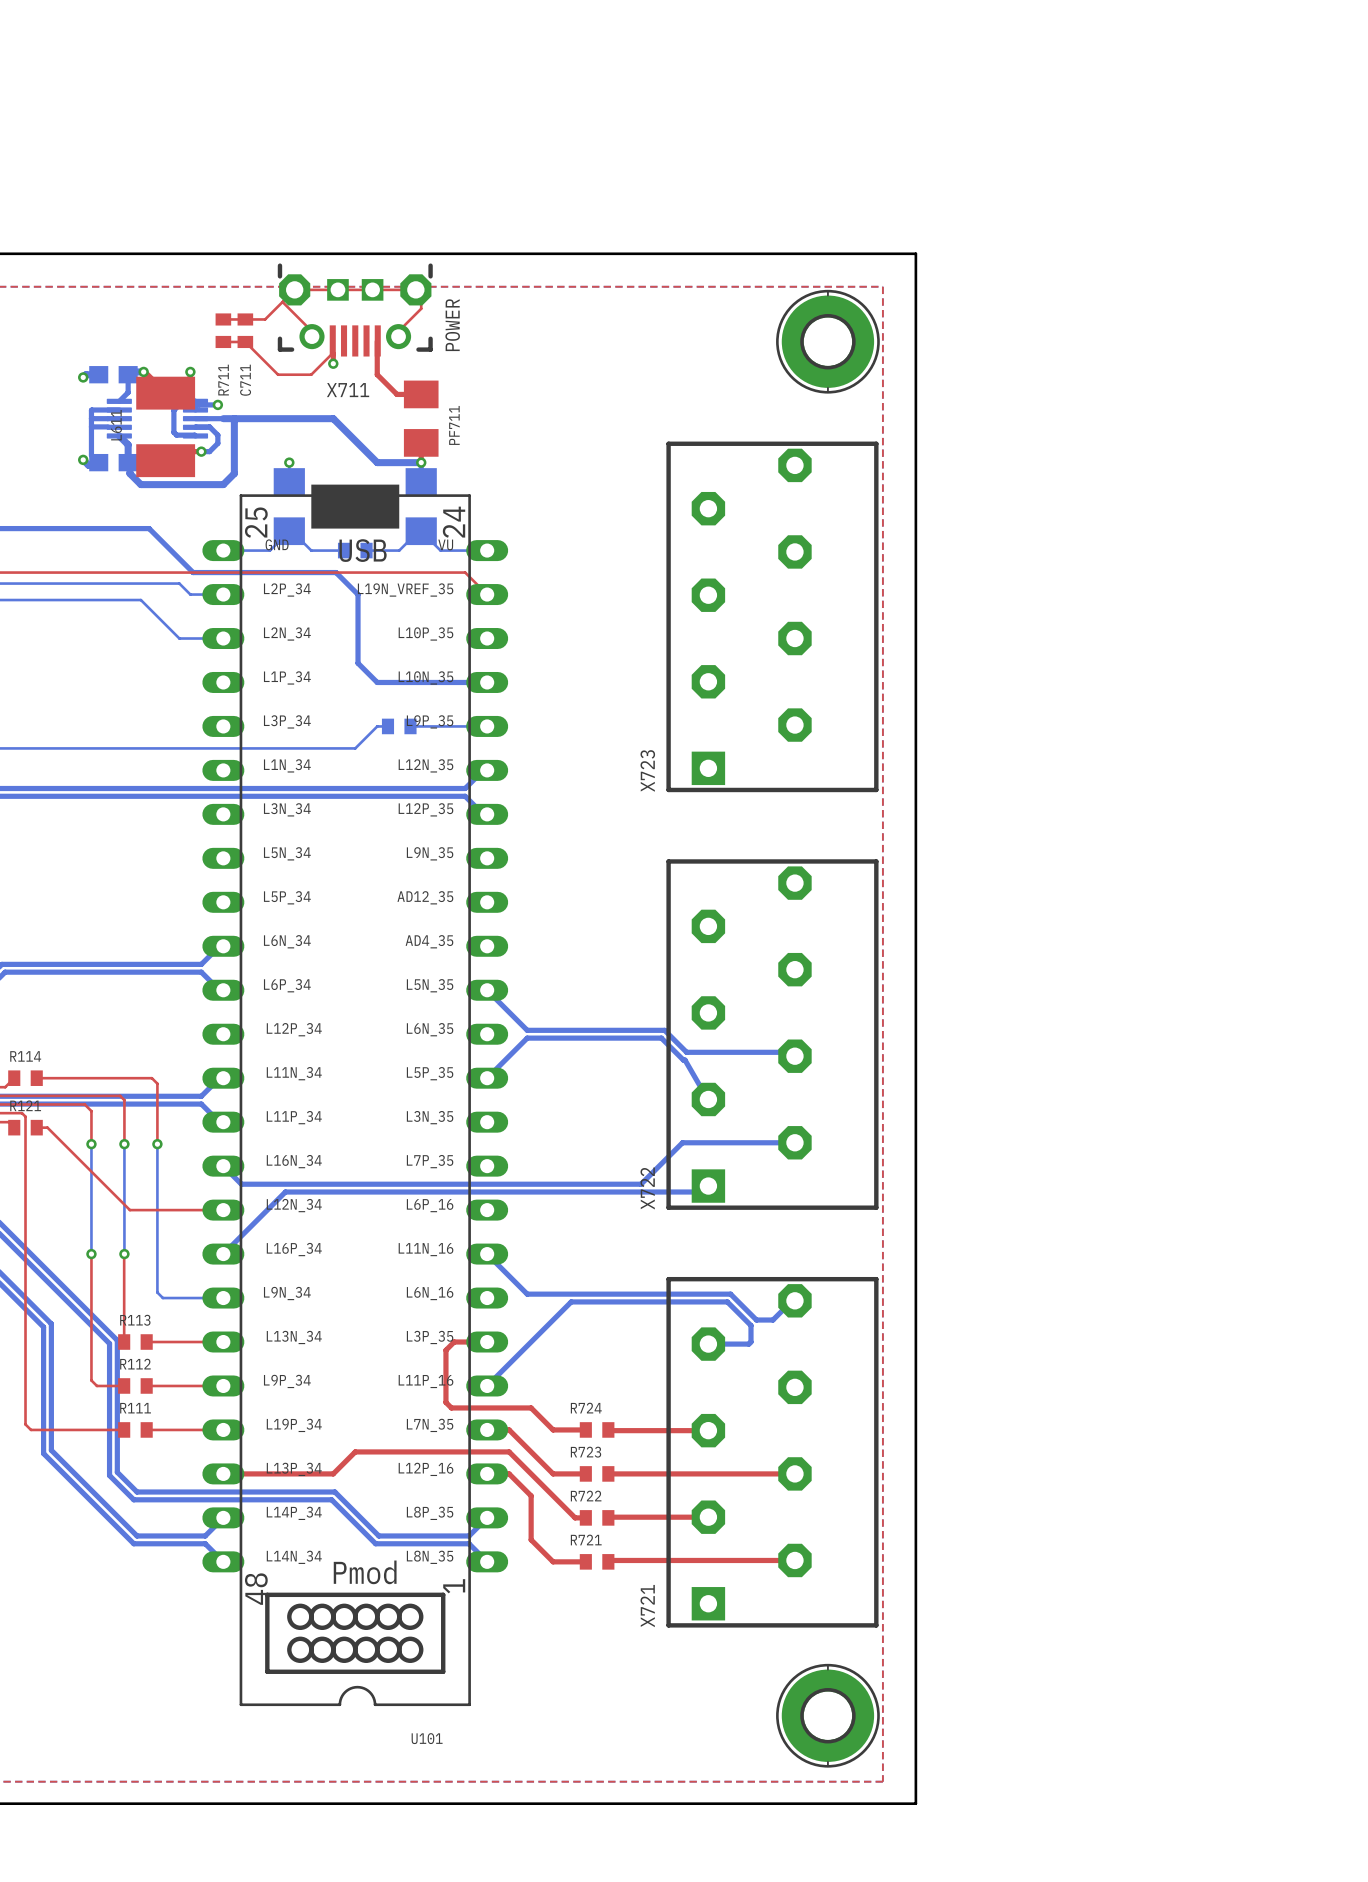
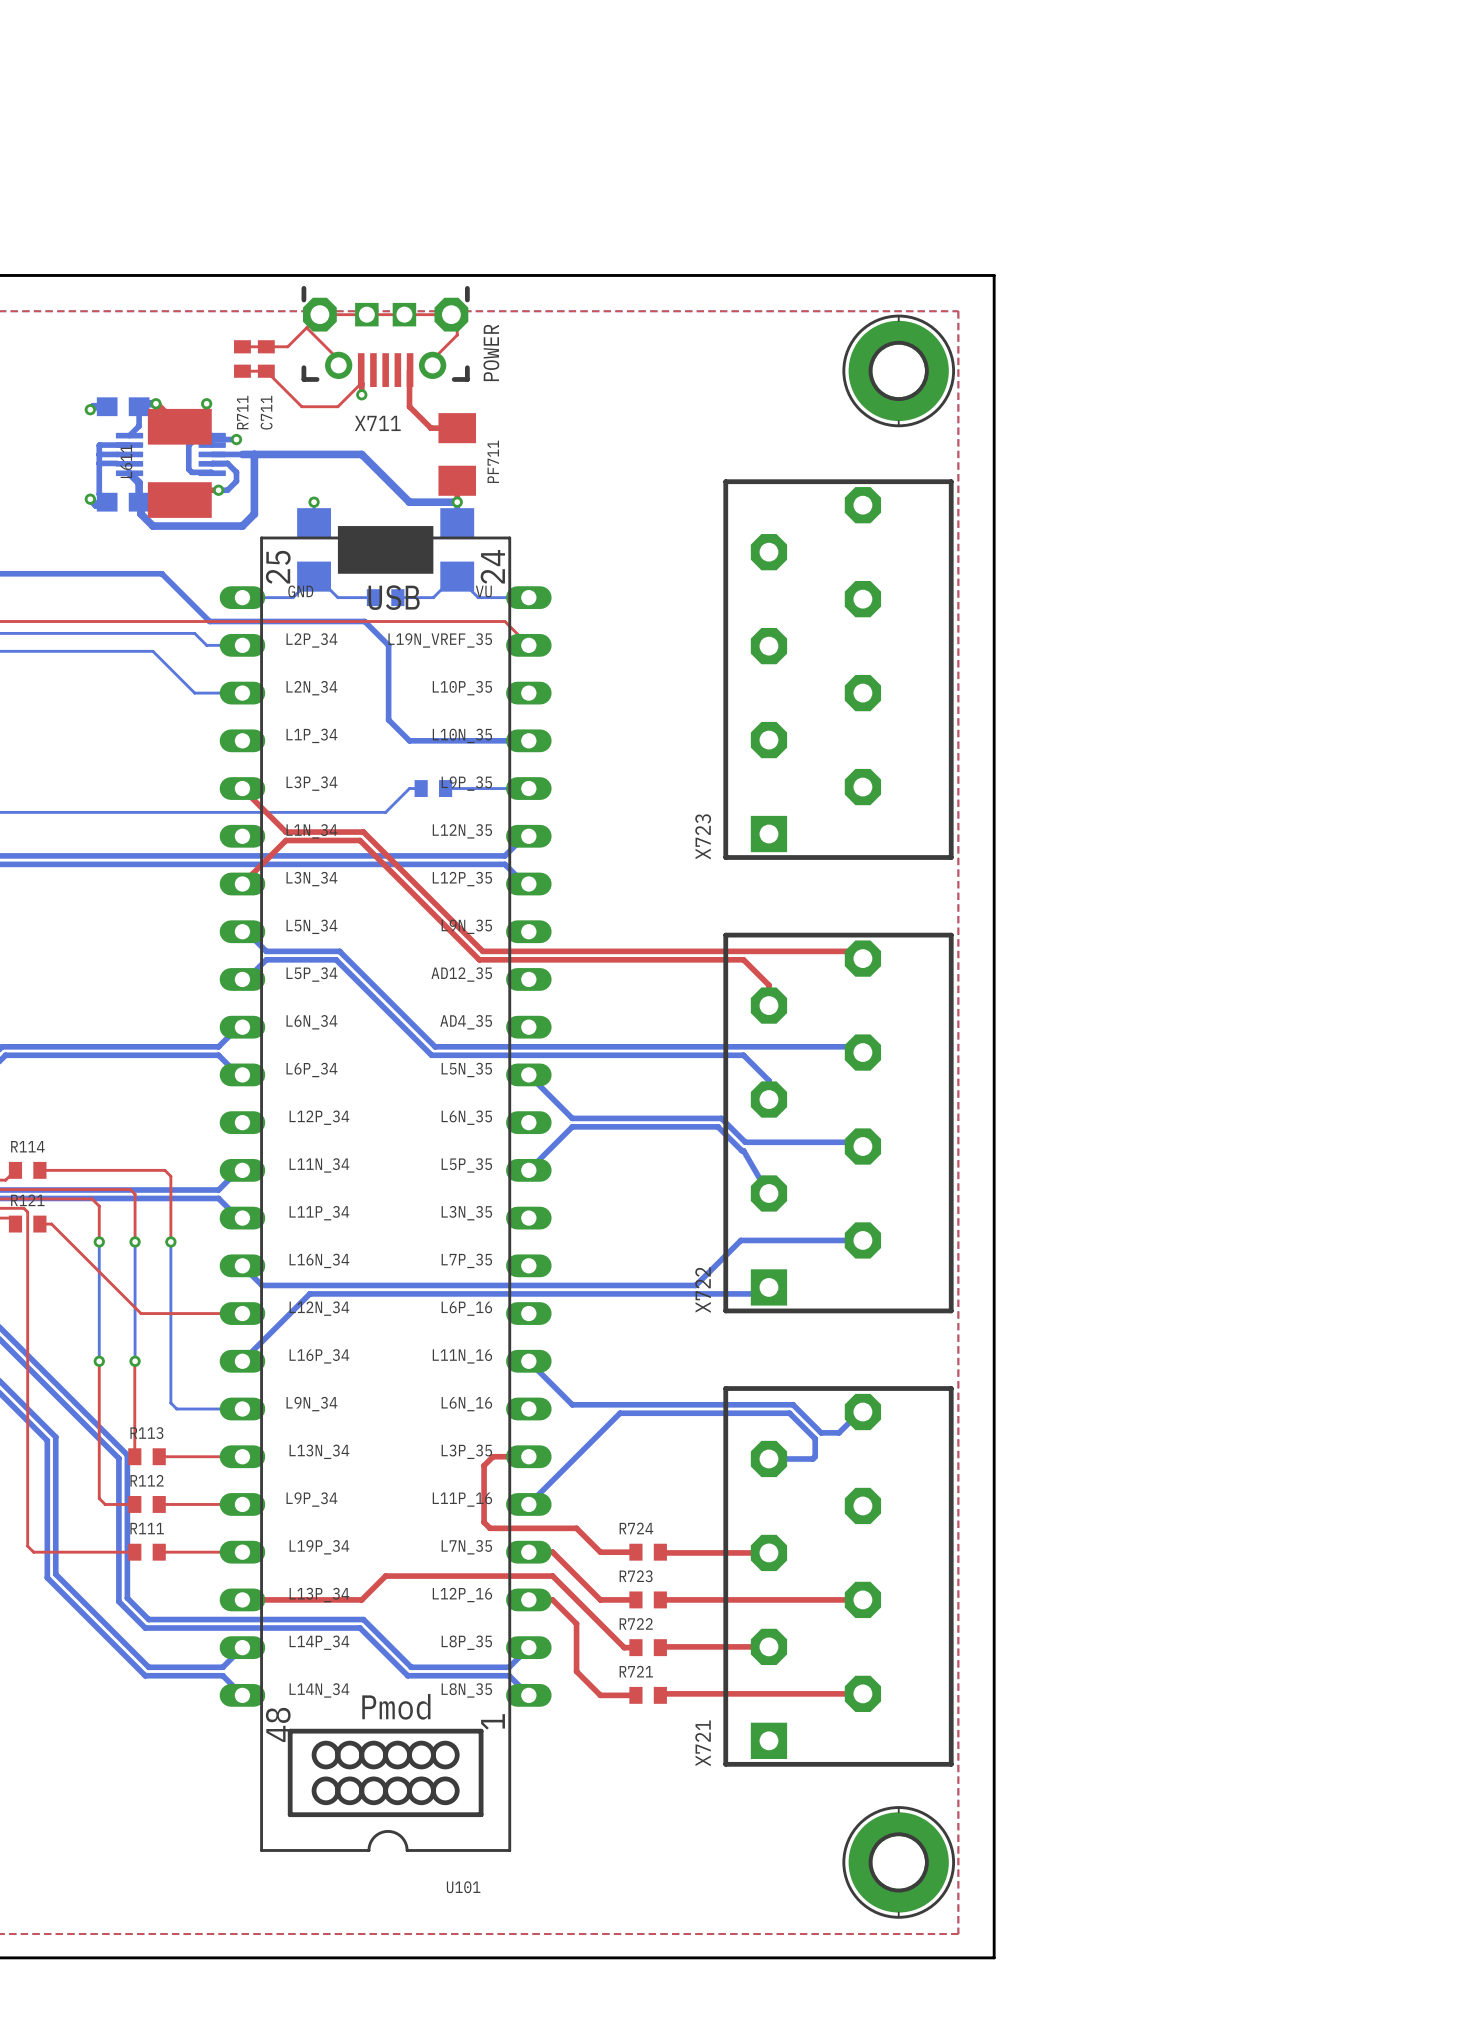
top track: none -> (242, 788) (285, 832) (363, 832) (482, 951) (855, 951) (862, 958)
top track: none -> (242, 884) (285, 840) (360, 840) (479, 959) (743, 959) (768, 985) (768, 1005)
bottom track: none -> (242, 931) (246, 931) (266, 951) (339, 951) (435, 1046) (857, 1046) (862, 1052)
bottom track: none -> (242, 979) (246, 979) (266, 959) (336, 959) (431, 1055) (743, 1055) (768, 1080) (768, 1099)

